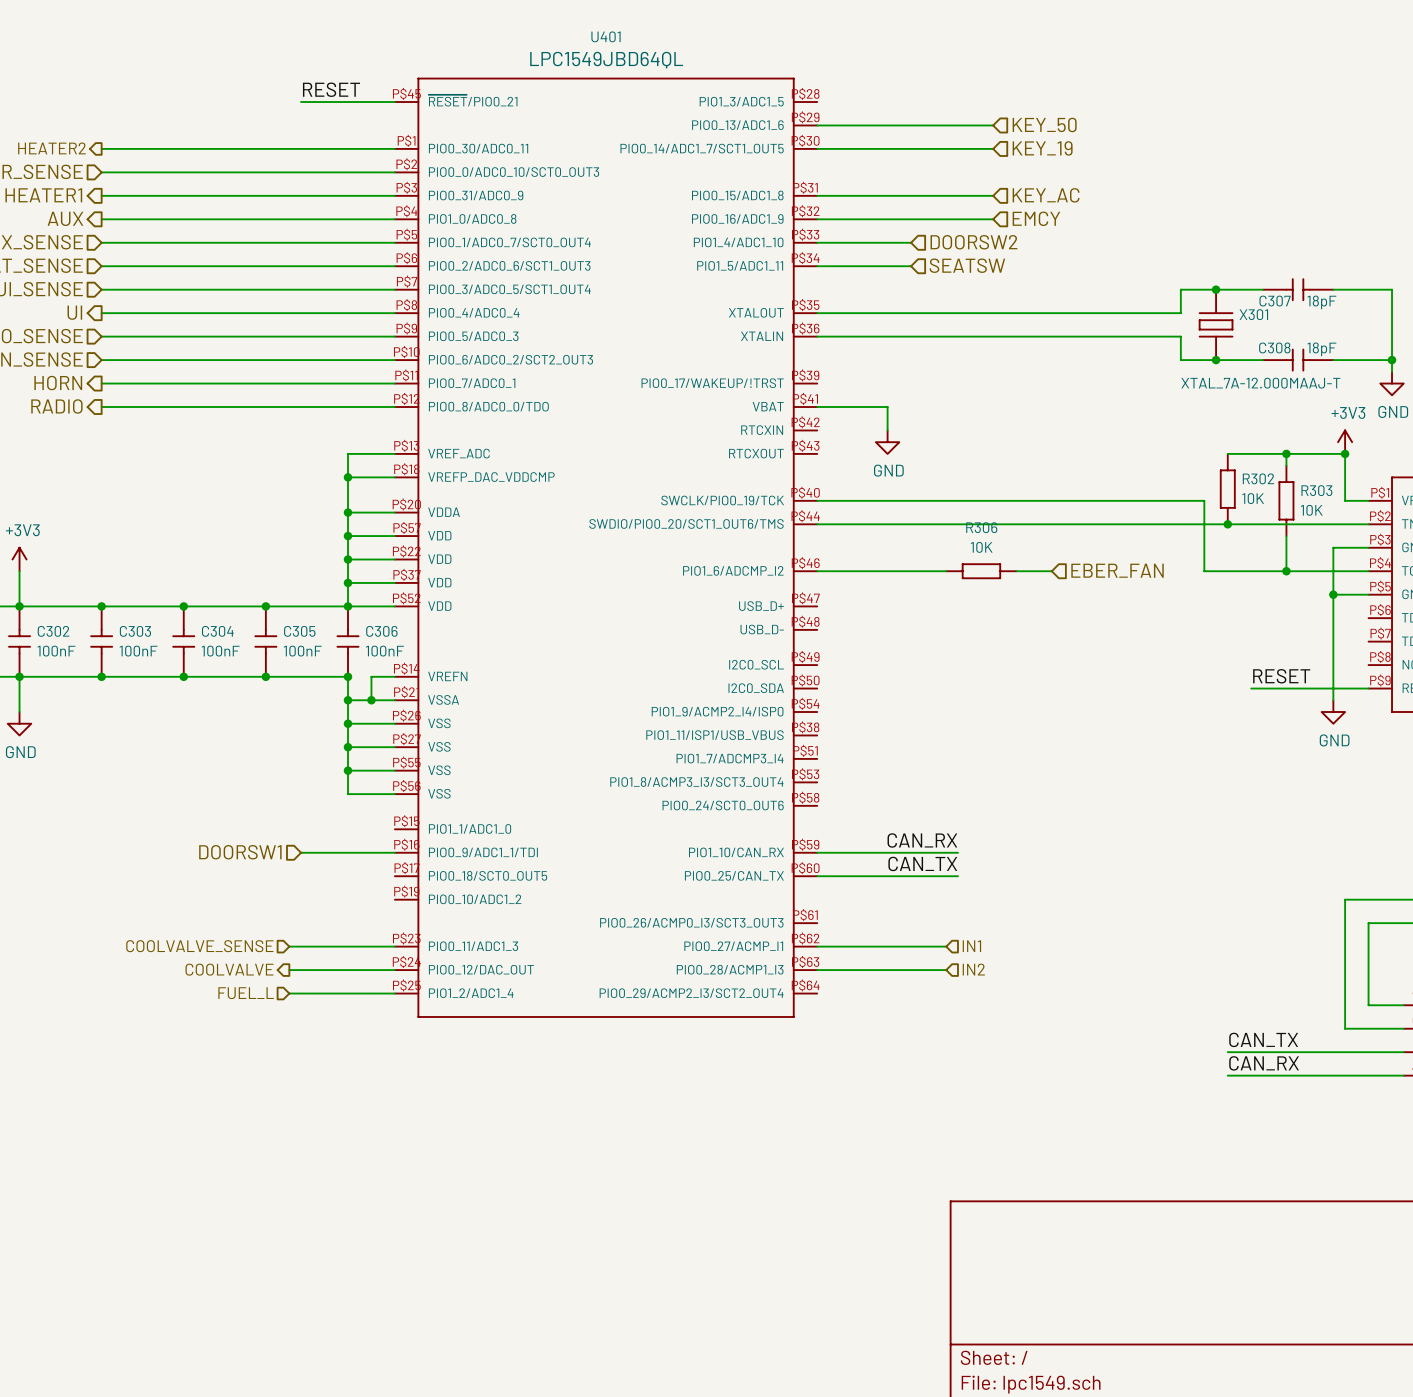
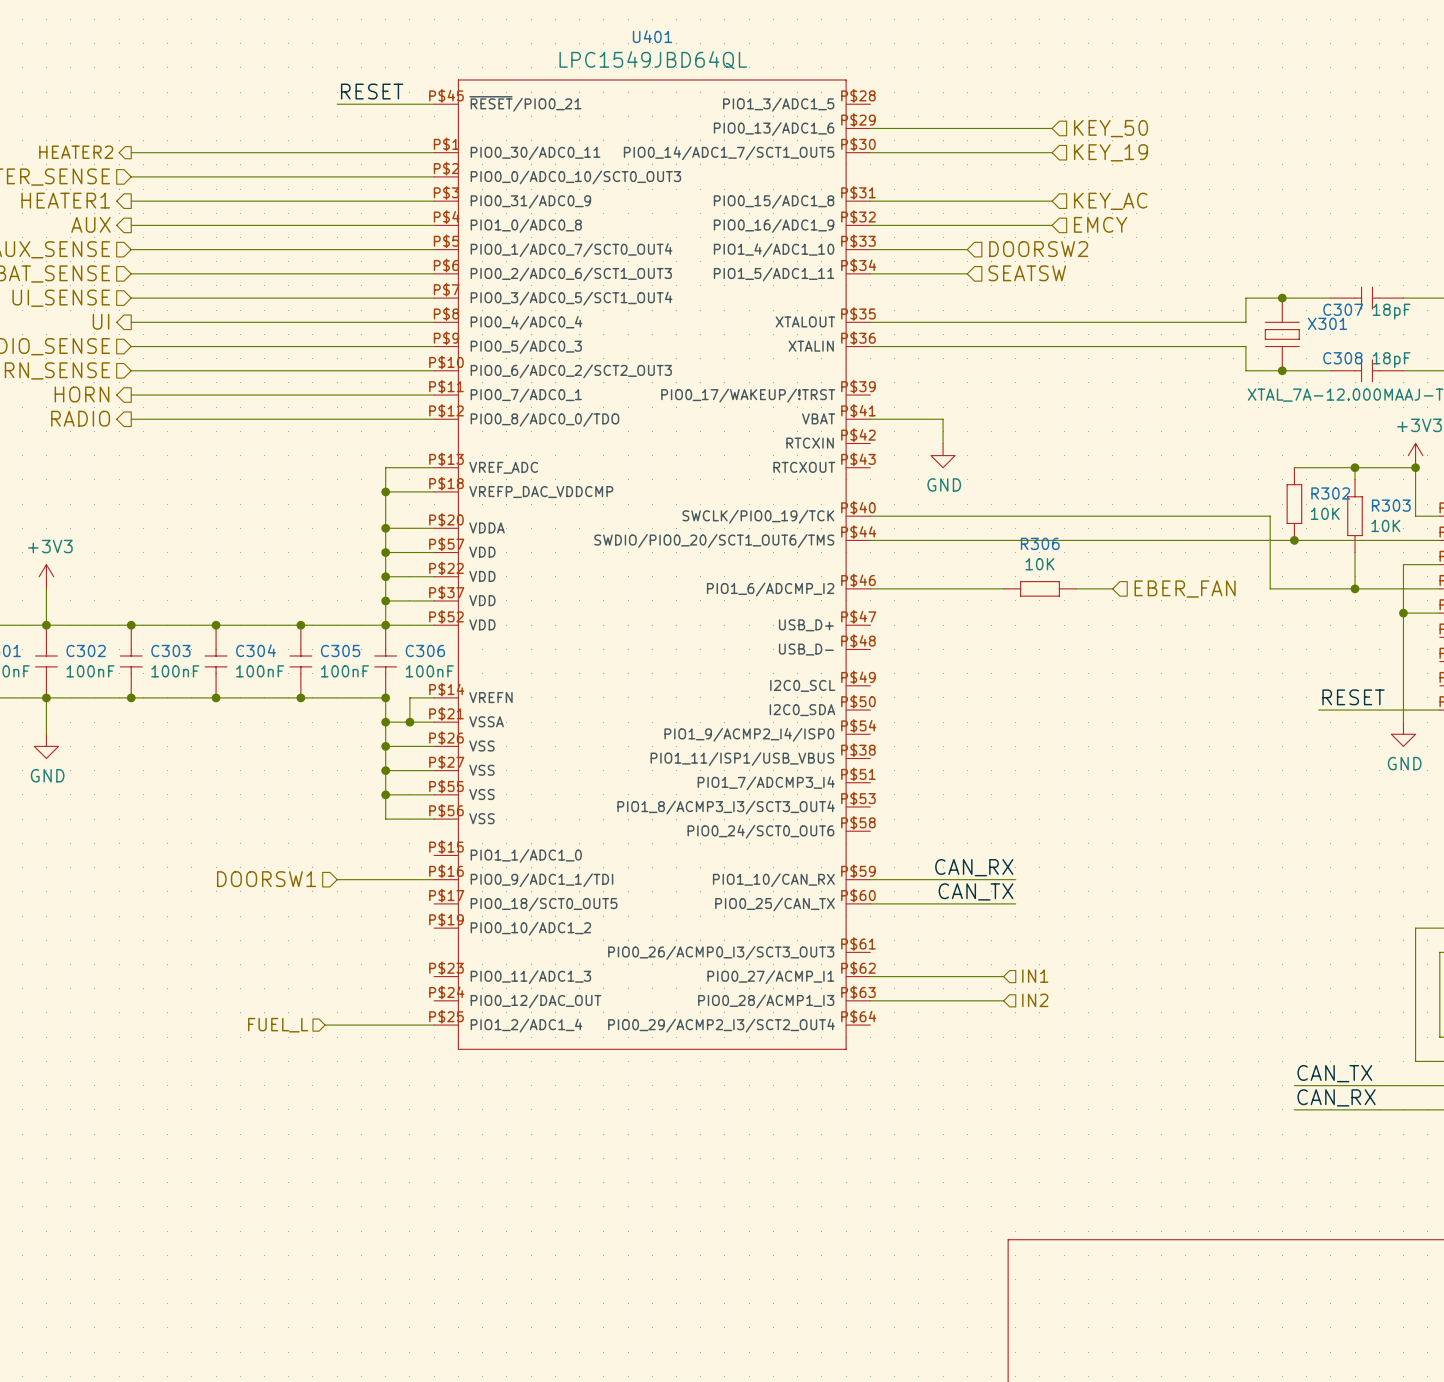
hierarchical label: COOLVALVE_SENSE (199, 946) -> none
wire: (289, 946) (394, 946) -> none
hierarchical label: COOLVALVE (229, 969) -> none
wire: (289, 970) (394, 970) -> none

